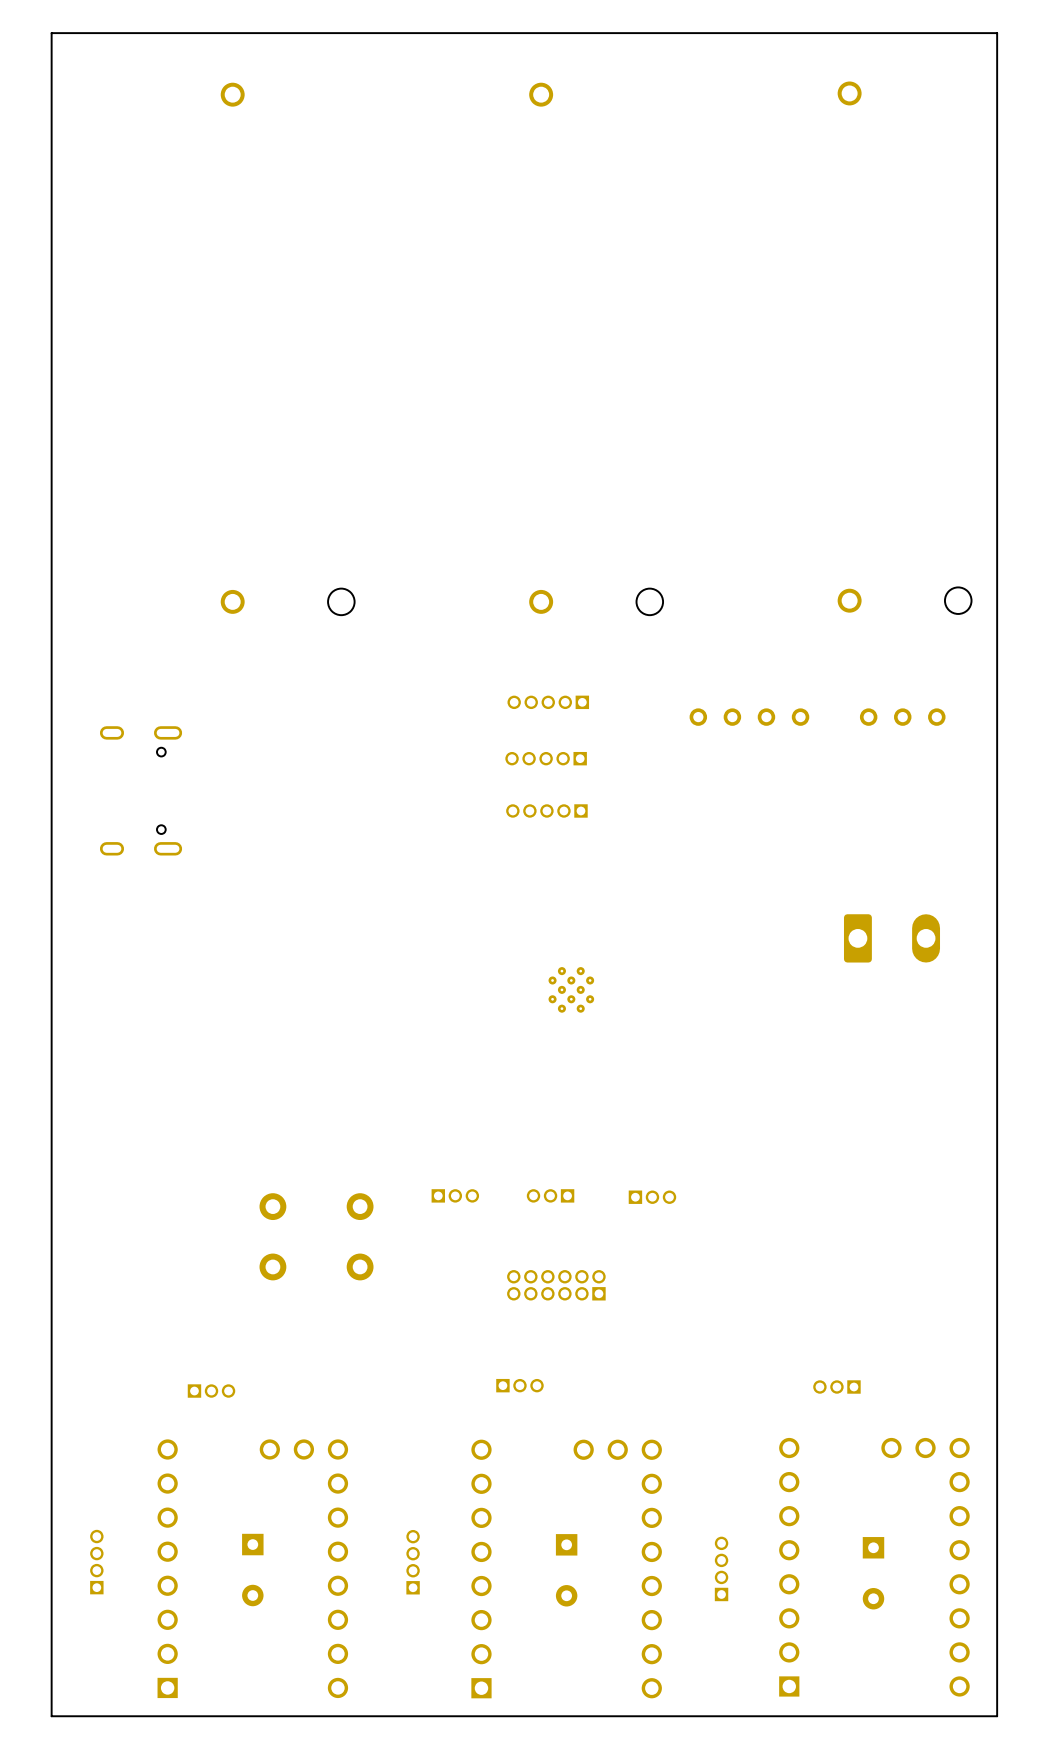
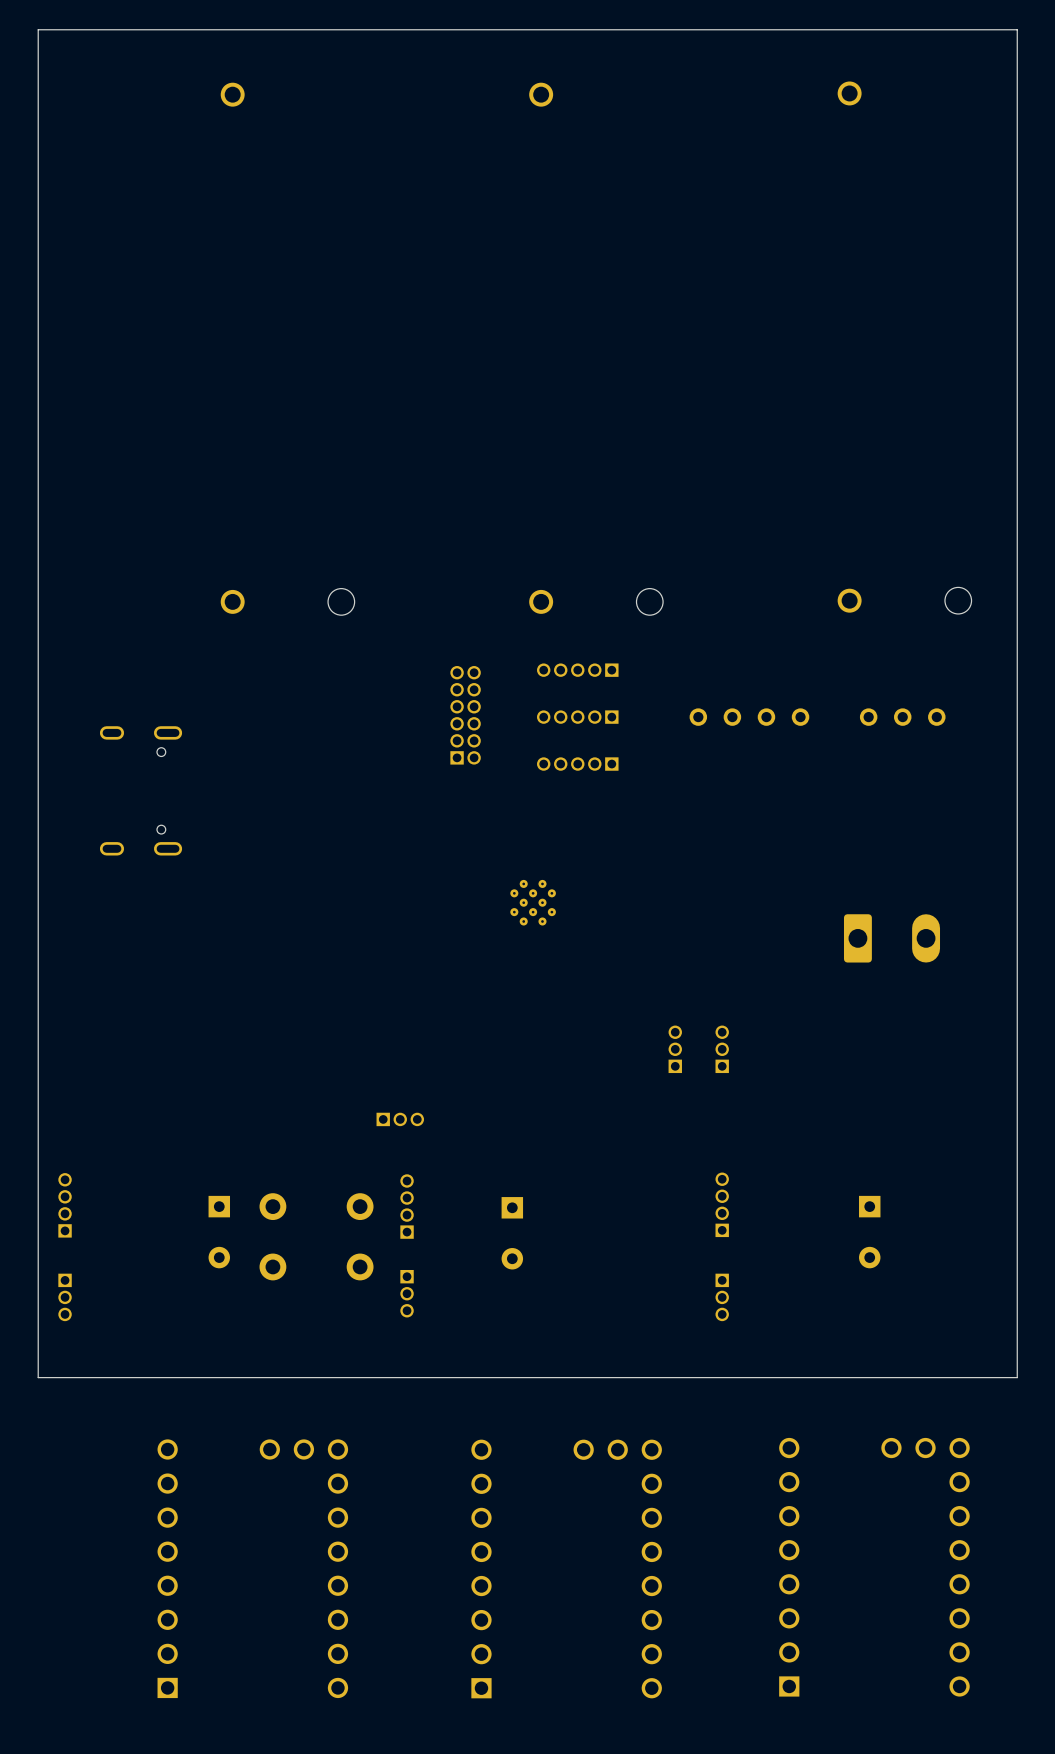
board edge: (997, 33) (51, 33) (51, 1716) (997, 1716) (997, 33) -> (1017, 29) (1017, 1377) (38, 1377) (38, 29) (1017, 29)
part: none -> (577, 670)
part: (548, 702) -> none
part: none -> (465, 715)
part: none -> (577, 717)
part: (546, 758) -> none
part: none -> (577, 764)
part: (546, 810) -> none
part position: (571, 989) -> (533, 902)
part: none -> (675, 1049)
part: none -> (722, 1049)
part: none -> (400, 1119)
part: (455, 1195) -> none
part: (550, 1195) -> none
part: (652, 1197) -> none
part: none -> (722, 1204)
part: none -> (65, 1205)
part: none -> (407, 1206)
part: none -> (219, 1232)
part: none -> (869, 1232)
part: none -> (512, 1233)
part: (556, 1285) -> none
part: none -> (407, 1293)
part: none -> (65, 1297)
part: none -> (722, 1297)
part: (519, 1385) -> none
part: (836, 1387) -> none
part: (211, 1391) -> none
part: (96, 1562) -> none
part: (413, 1562) -> none
part: (721, 1568) -> none
part: (252, 1570) -> none
part: (566, 1570) -> none
part: (873, 1573) -> none

